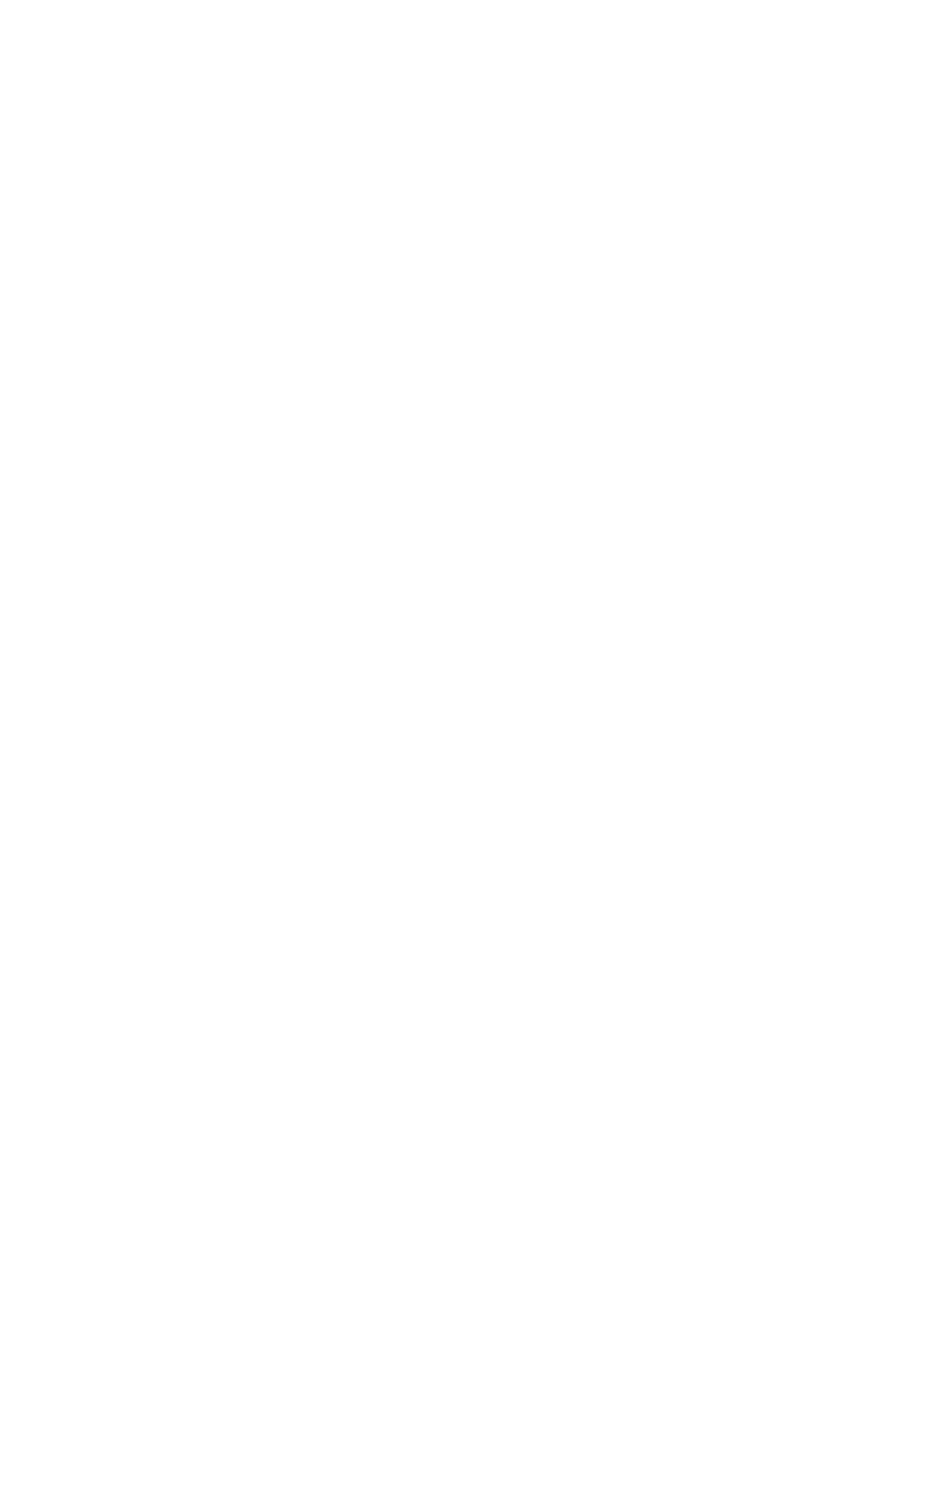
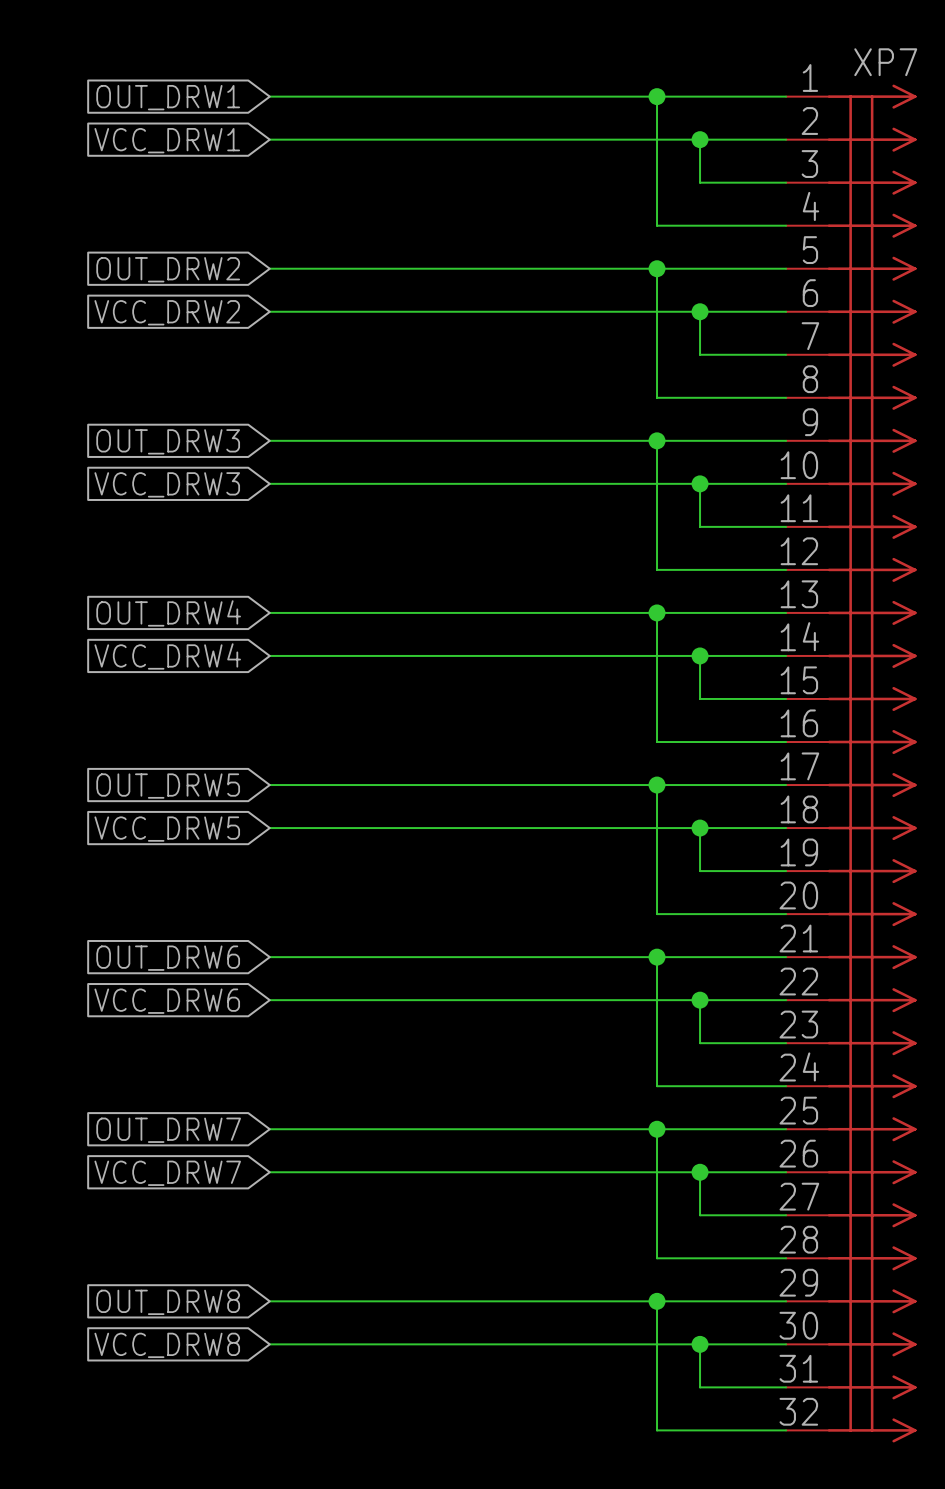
wire: none -> (269, 96) (786, 96)
wire: none -> (657, 96) (657, 225) (786, 225)
junction: none -> (657, 96)
global label: none -> OUT_DRW1 (168, 97)
wire: none -> (269, 139) (786, 139)
wire: none -> (700, 139) (700, 182) (786, 182)
junction: none -> (700, 139)
global label: none -> VCC_DRW1 (167, 140)
wire: none -> (269, 268) (786, 268)
wire: none -> (657, 268) (657, 397) (786, 397)
junction: none -> (657, 268)
global label: none -> OUT_DRW2 (168, 269)
wire: none -> (269, 311) (786, 311)
wire: none -> (700, 311) (700, 354) (786, 354)
junction: none -> (700, 311)
global label: none -> VCC_DRW2 (167, 312)
wire: none -> (269, 440) (786, 440)
wire: none -> (657, 440) (657, 569) (786, 569)
junction: none -> (657, 440)
global label: none -> OUT_DRW3 (168, 441)
wire: none -> (269, 483) (786, 483)
wire: none -> (700, 483) (700, 526) (786, 526)
junction: none -> (700, 483)
global label: none -> VCC_DRW3 (167, 484)
wire: none -> (269, 612) (786, 612)
wire: none -> (657, 612) (657, 742) (786, 742)
junction: none -> (657, 612)
global label: none -> OUT_DRW4 (168, 613)
wire: none -> (269, 655) (786, 655)
wire: none -> (700, 655) (700, 698) (786, 698)
junction: none -> (700, 655)
global label: none -> VCC_DRW4 (167, 656)
XP7: none -> (851, 763)
wire: none -> (269, 785) (786, 785)
wire: none -> (657, 785) (657, 914) (786, 914)
junction: none -> (657, 785)
global label: none -> OUT_DRW5 (168, 786)
wire: none -> (269, 828) (786, 828)
wire: none -> (700, 828) (700, 871) (786, 871)
junction: none -> (700, 828)
global label: none -> VCC_DRW5 (167, 829)
wire: none -> (269, 957) (786, 957)
wire: none -> (657, 957) (657, 1086) (786, 1086)
junction: none -> (657, 957)
global label: none -> OUT_DRW6 (168, 958)
wire: none -> (269, 1000) (786, 1000)
wire: none -> (700, 1000) (700, 1043) (786, 1043)
junction: none -> (700, 1000)
global label: none -> VCC_DRW6 (167, 1001)
wire: none -> (269, 1129) (786, 1129)
wire: none -> (657, 1129) (657, 1258) (786, 1258)
junction: none -> (657, 1129)
global label: none -> OUT_DRW7 (168, 1130)
wire: none -> (269, 1172) (786, 1172)
wire: none -> (700, 1172) (700, 1215) (786, 1215)
junction: none -> (700, 1172)
global label: none -> VCC_DRW7 (167, 1173)
wire: none -> (269, 1301) (786, 1301)
wire: none -> (657, 1301) (657, 1430) (786, 1430)
junction: none -> (657, 1301)
global label: none -> OUT_DRW8 (168, 1302)
wire: none -> (269, 1344) (786, 1344)
wire: none -> (700, 1344) (700, 1387) (786, 1387)
junction: none -> (700, 1344)
global label: none -> VCC_DRW8 (167, 1345)

